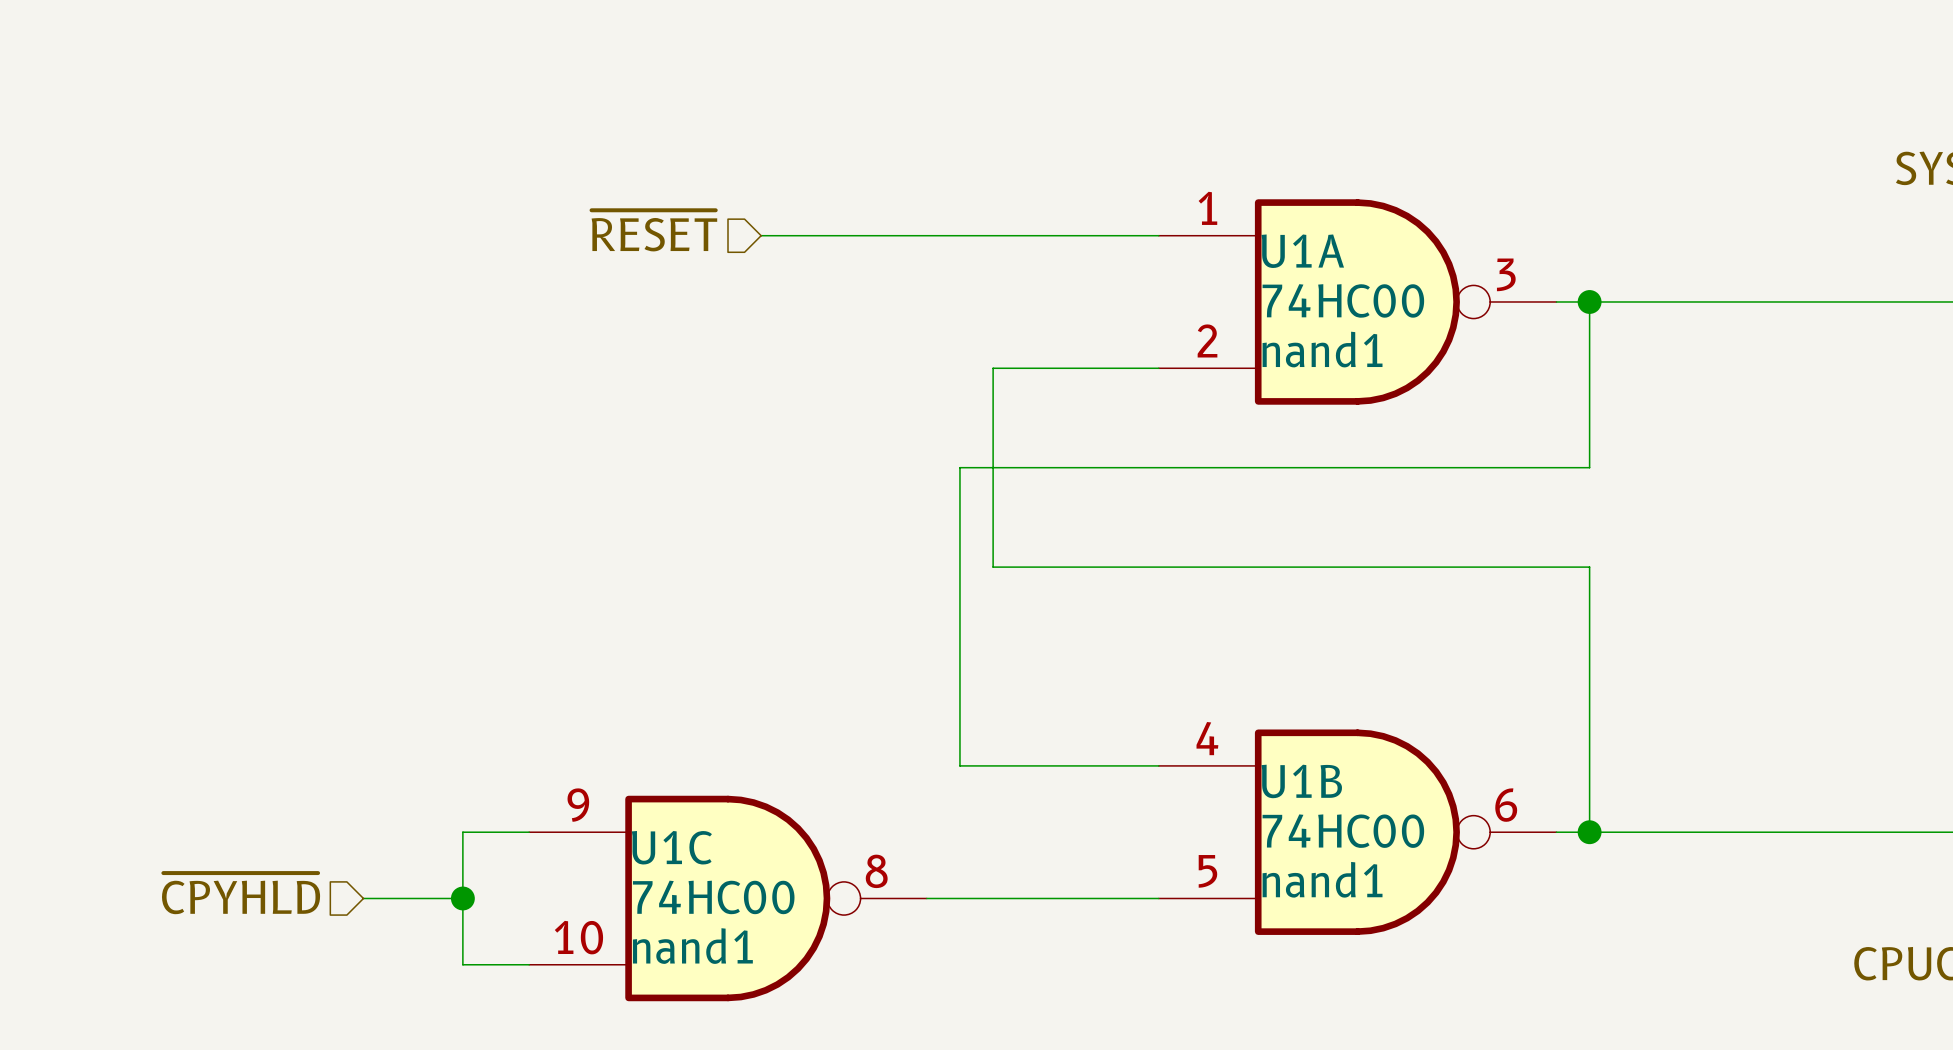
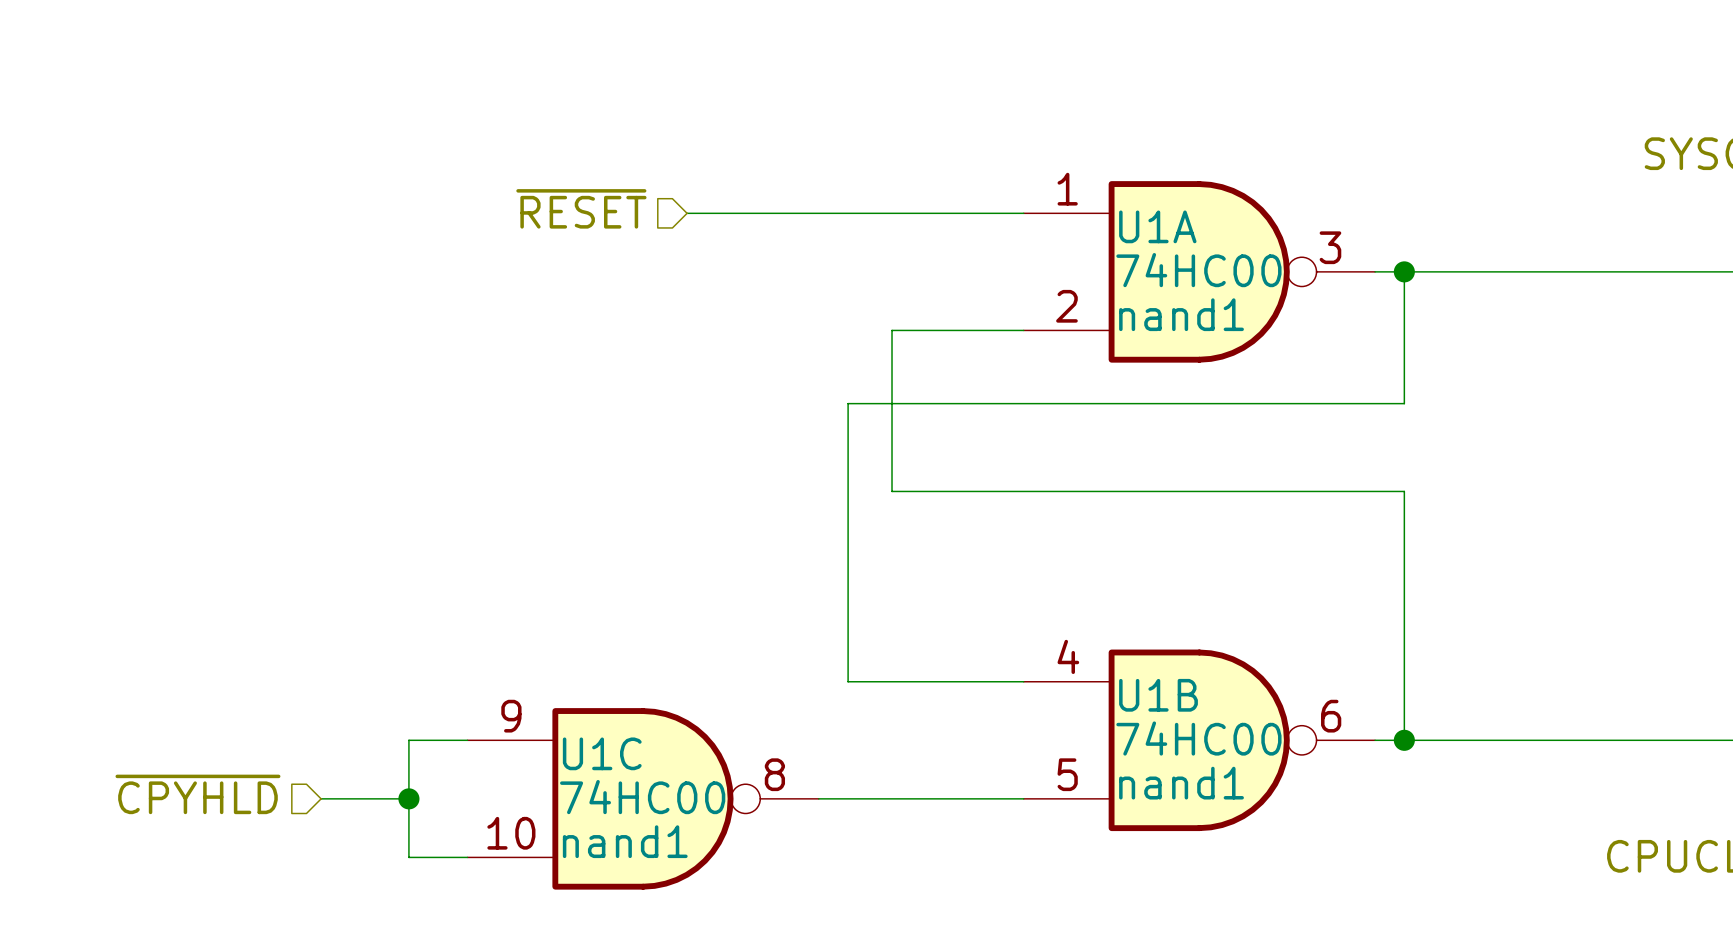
hierarchical label position: ~{RESET} (654, 230) -> ~{RESET} (581, 208)
wire: (761, 235) (777, 235) -> none
wire: (1009, 368) (993, 368) (993, 567) (1589, 567) -> (892, 330) (892, 491) (1404, 491) (1404, 506)
wire: (1589, 451) (1589, 467) (959, 467) -> (1404, 403) (848, 403) (848, 418)

